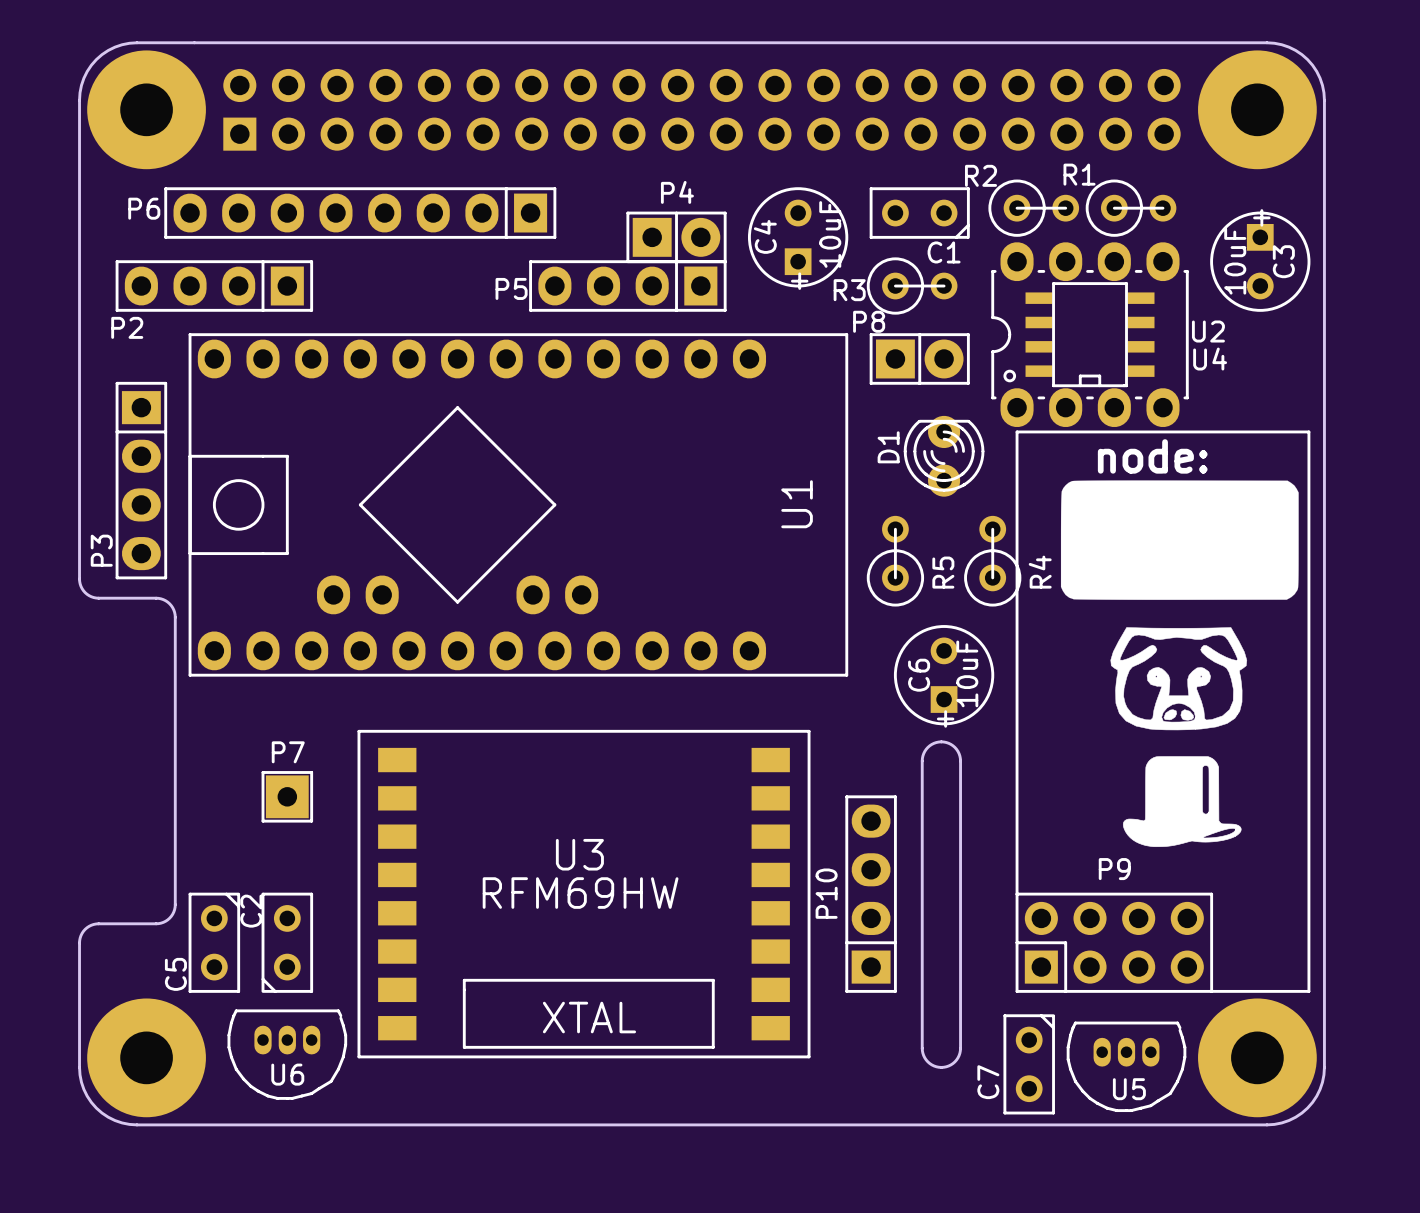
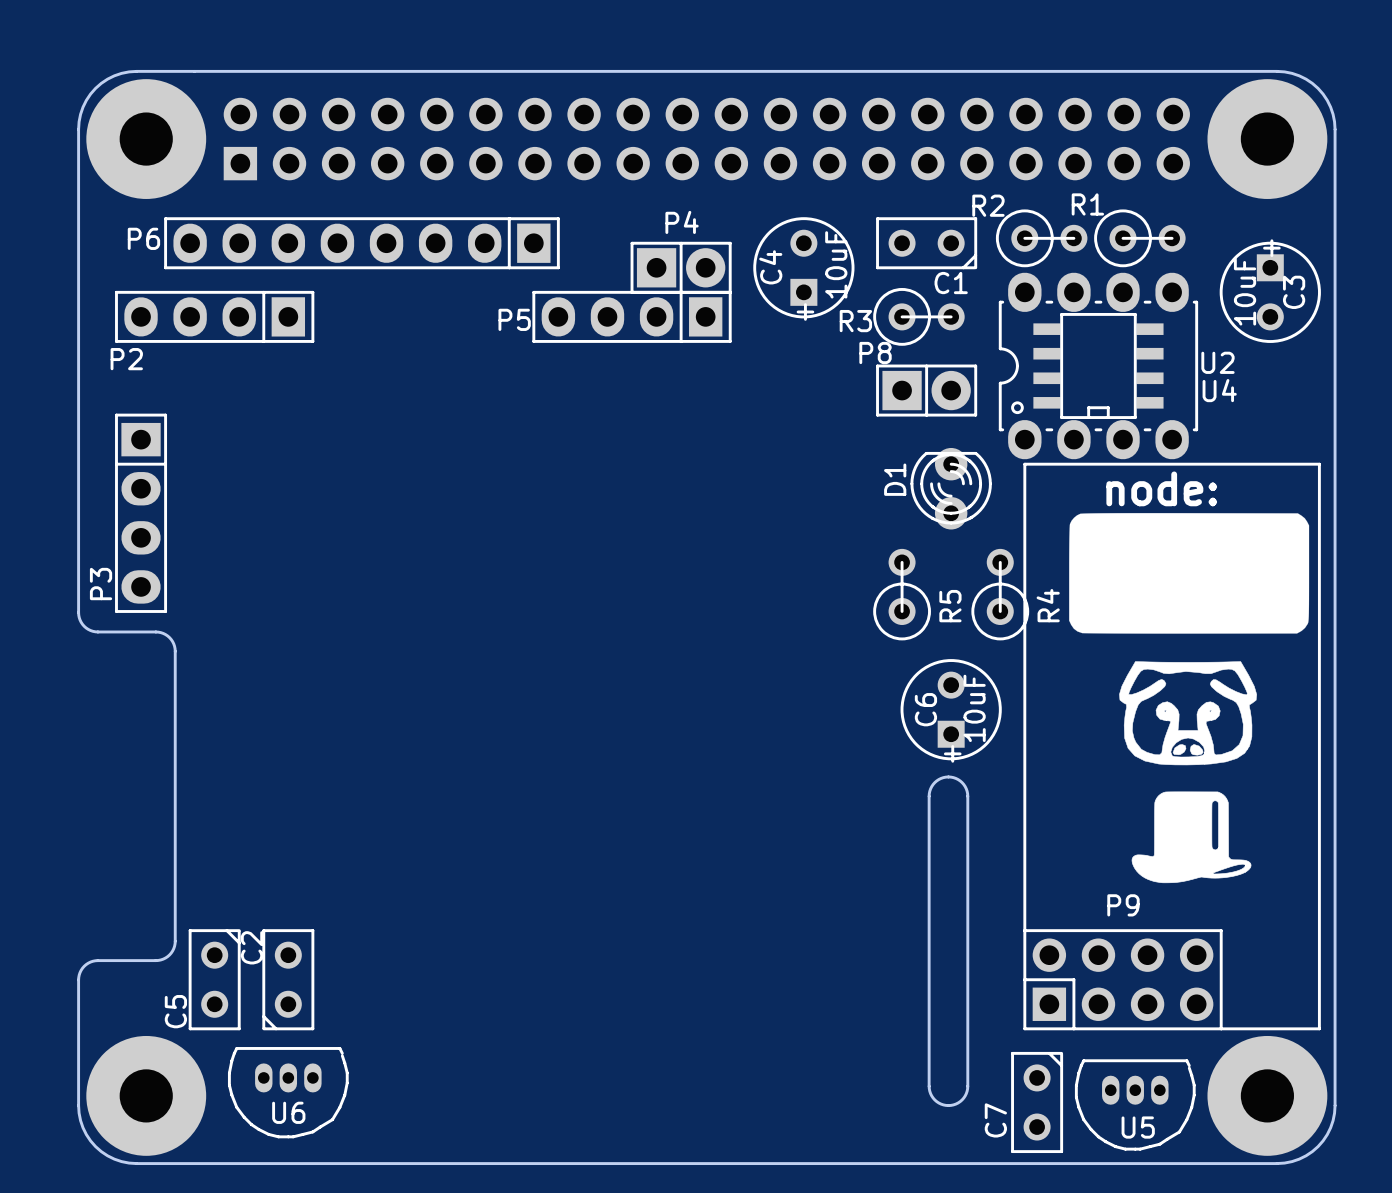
U1: (518, 504) -> none
P7: (287, 796) -> none
U3: RFM69HW (584, 894) -> none
P10: (871, 894) -> none

